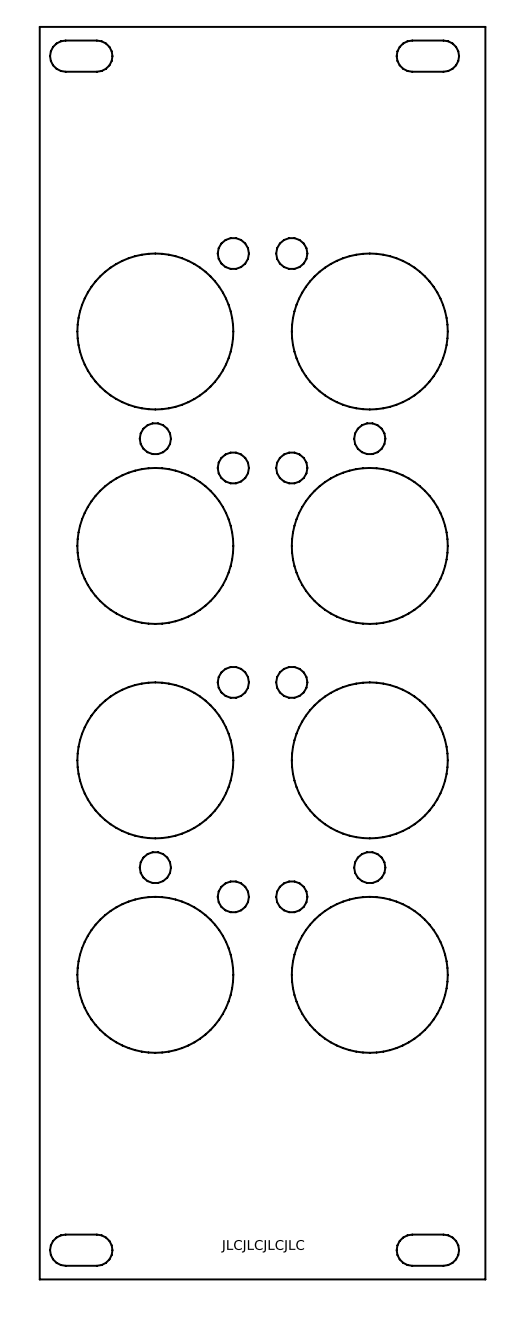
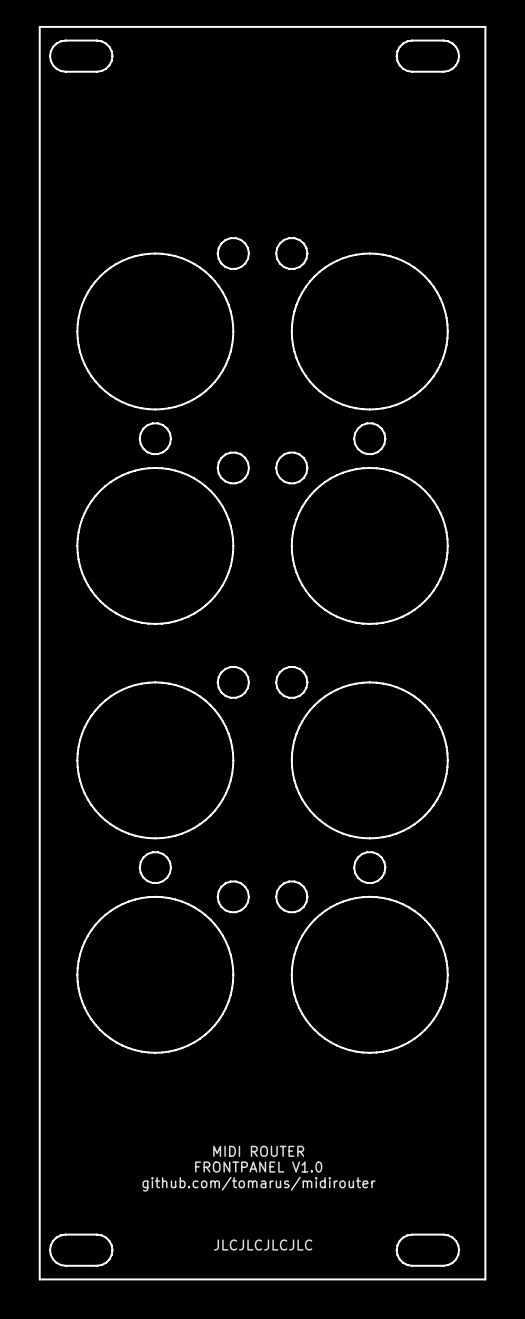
text: none -> MIDI ROUTER (258, 1151)
text: none -> FRONTPANEL V1.0 (258, 1167)
text: none -> github.com/tomarus/midirouter (258, 1184)

